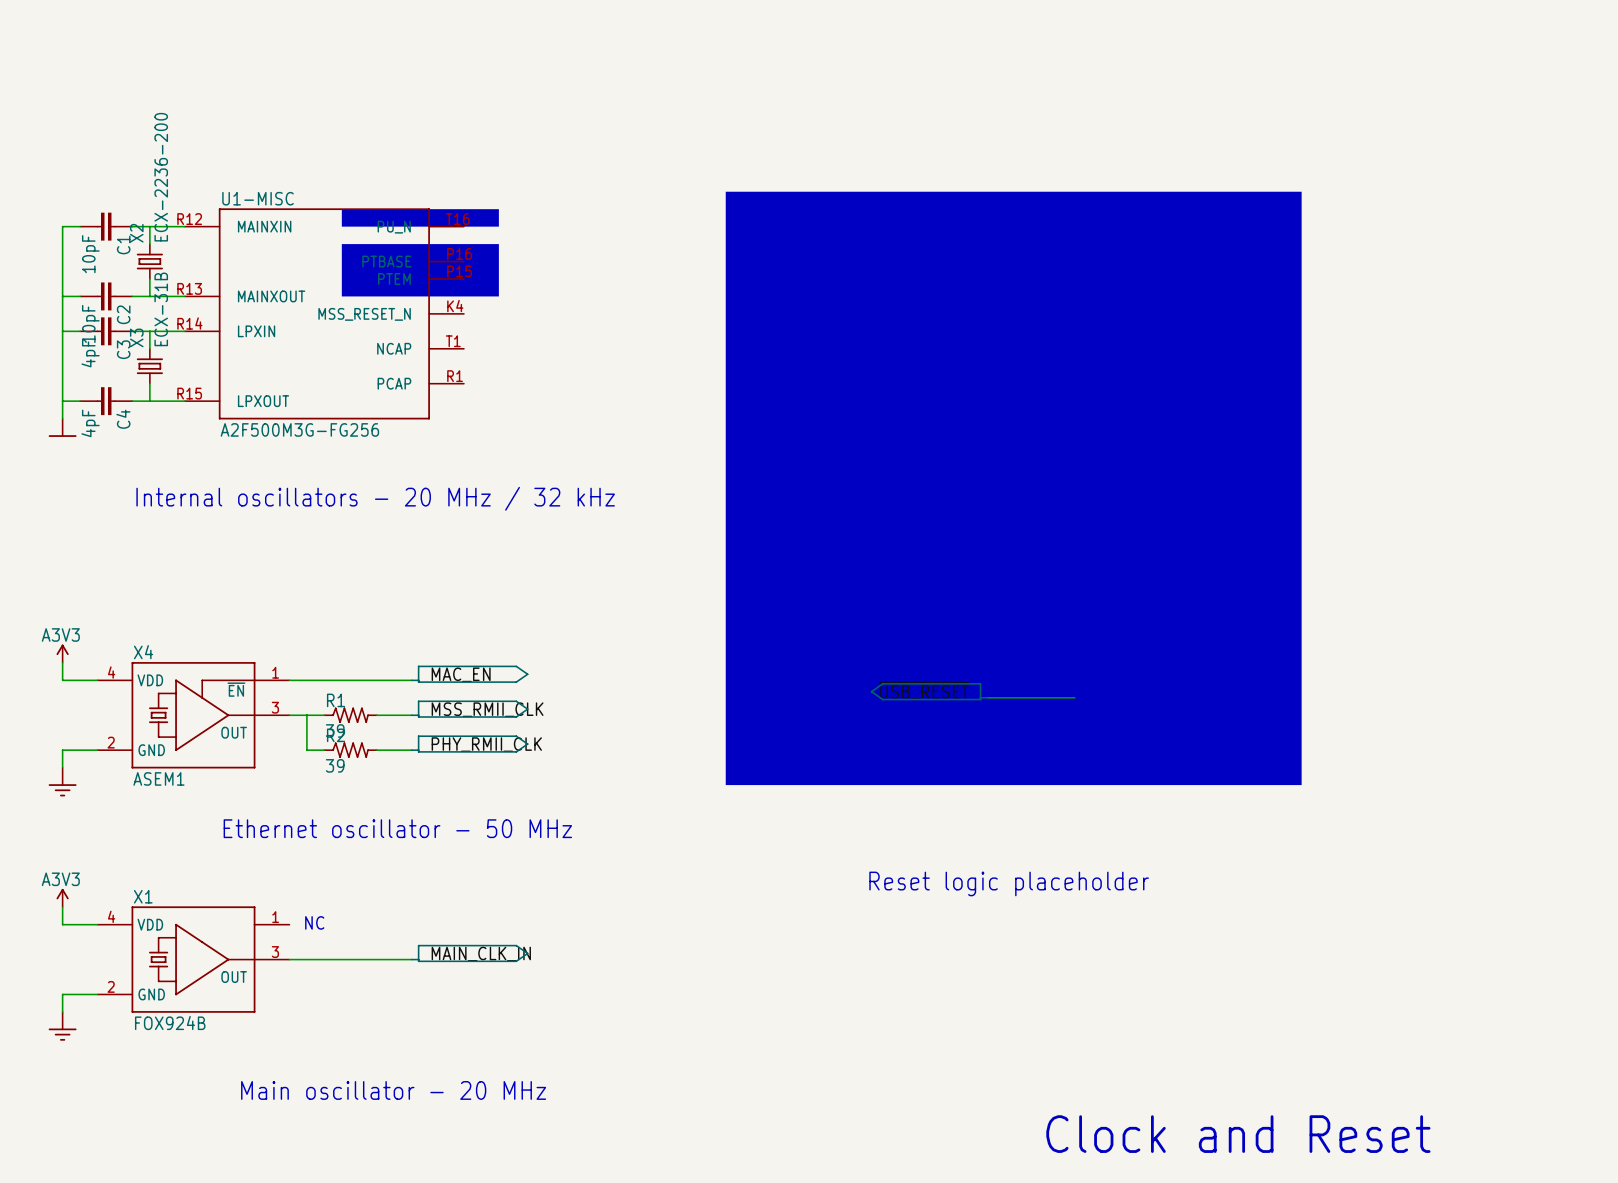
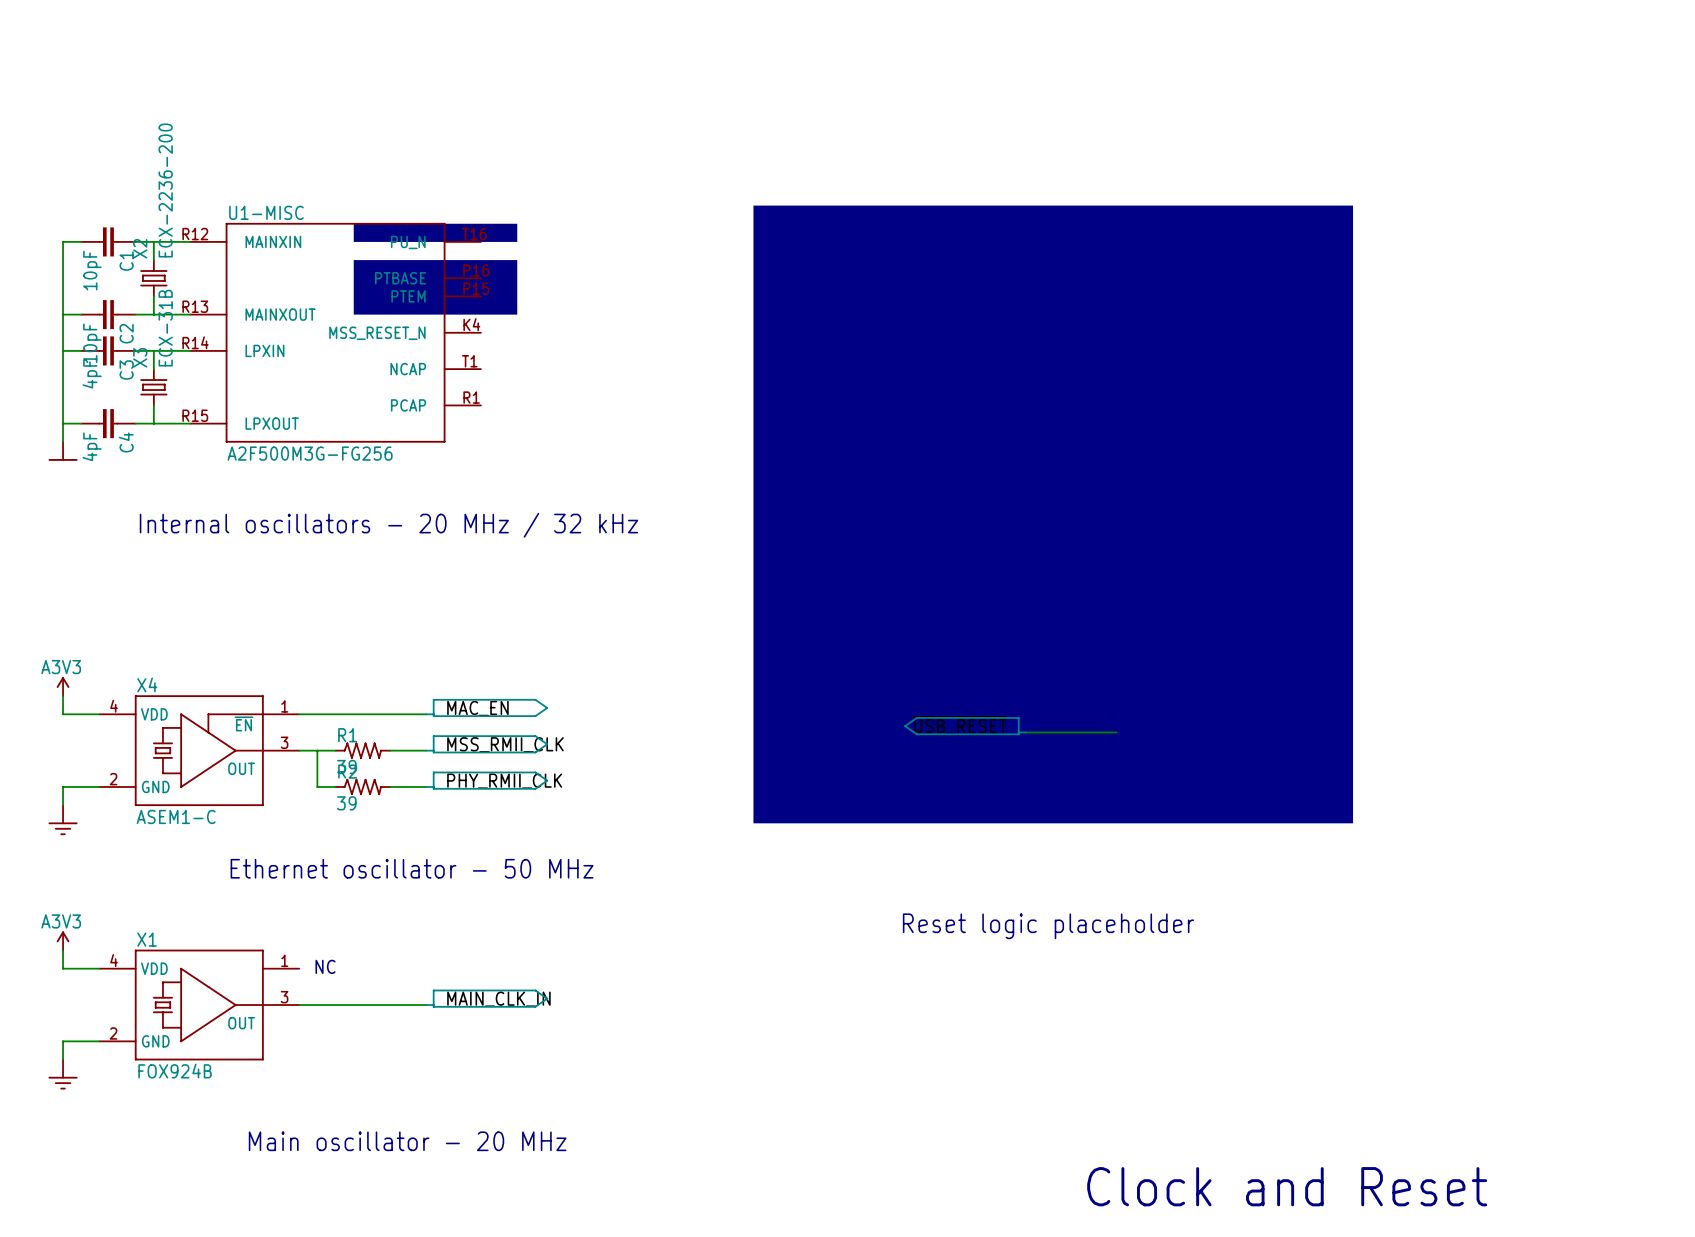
X4 value: ASEM1 (158, 778) -> ASEM1-C (176, 816)

